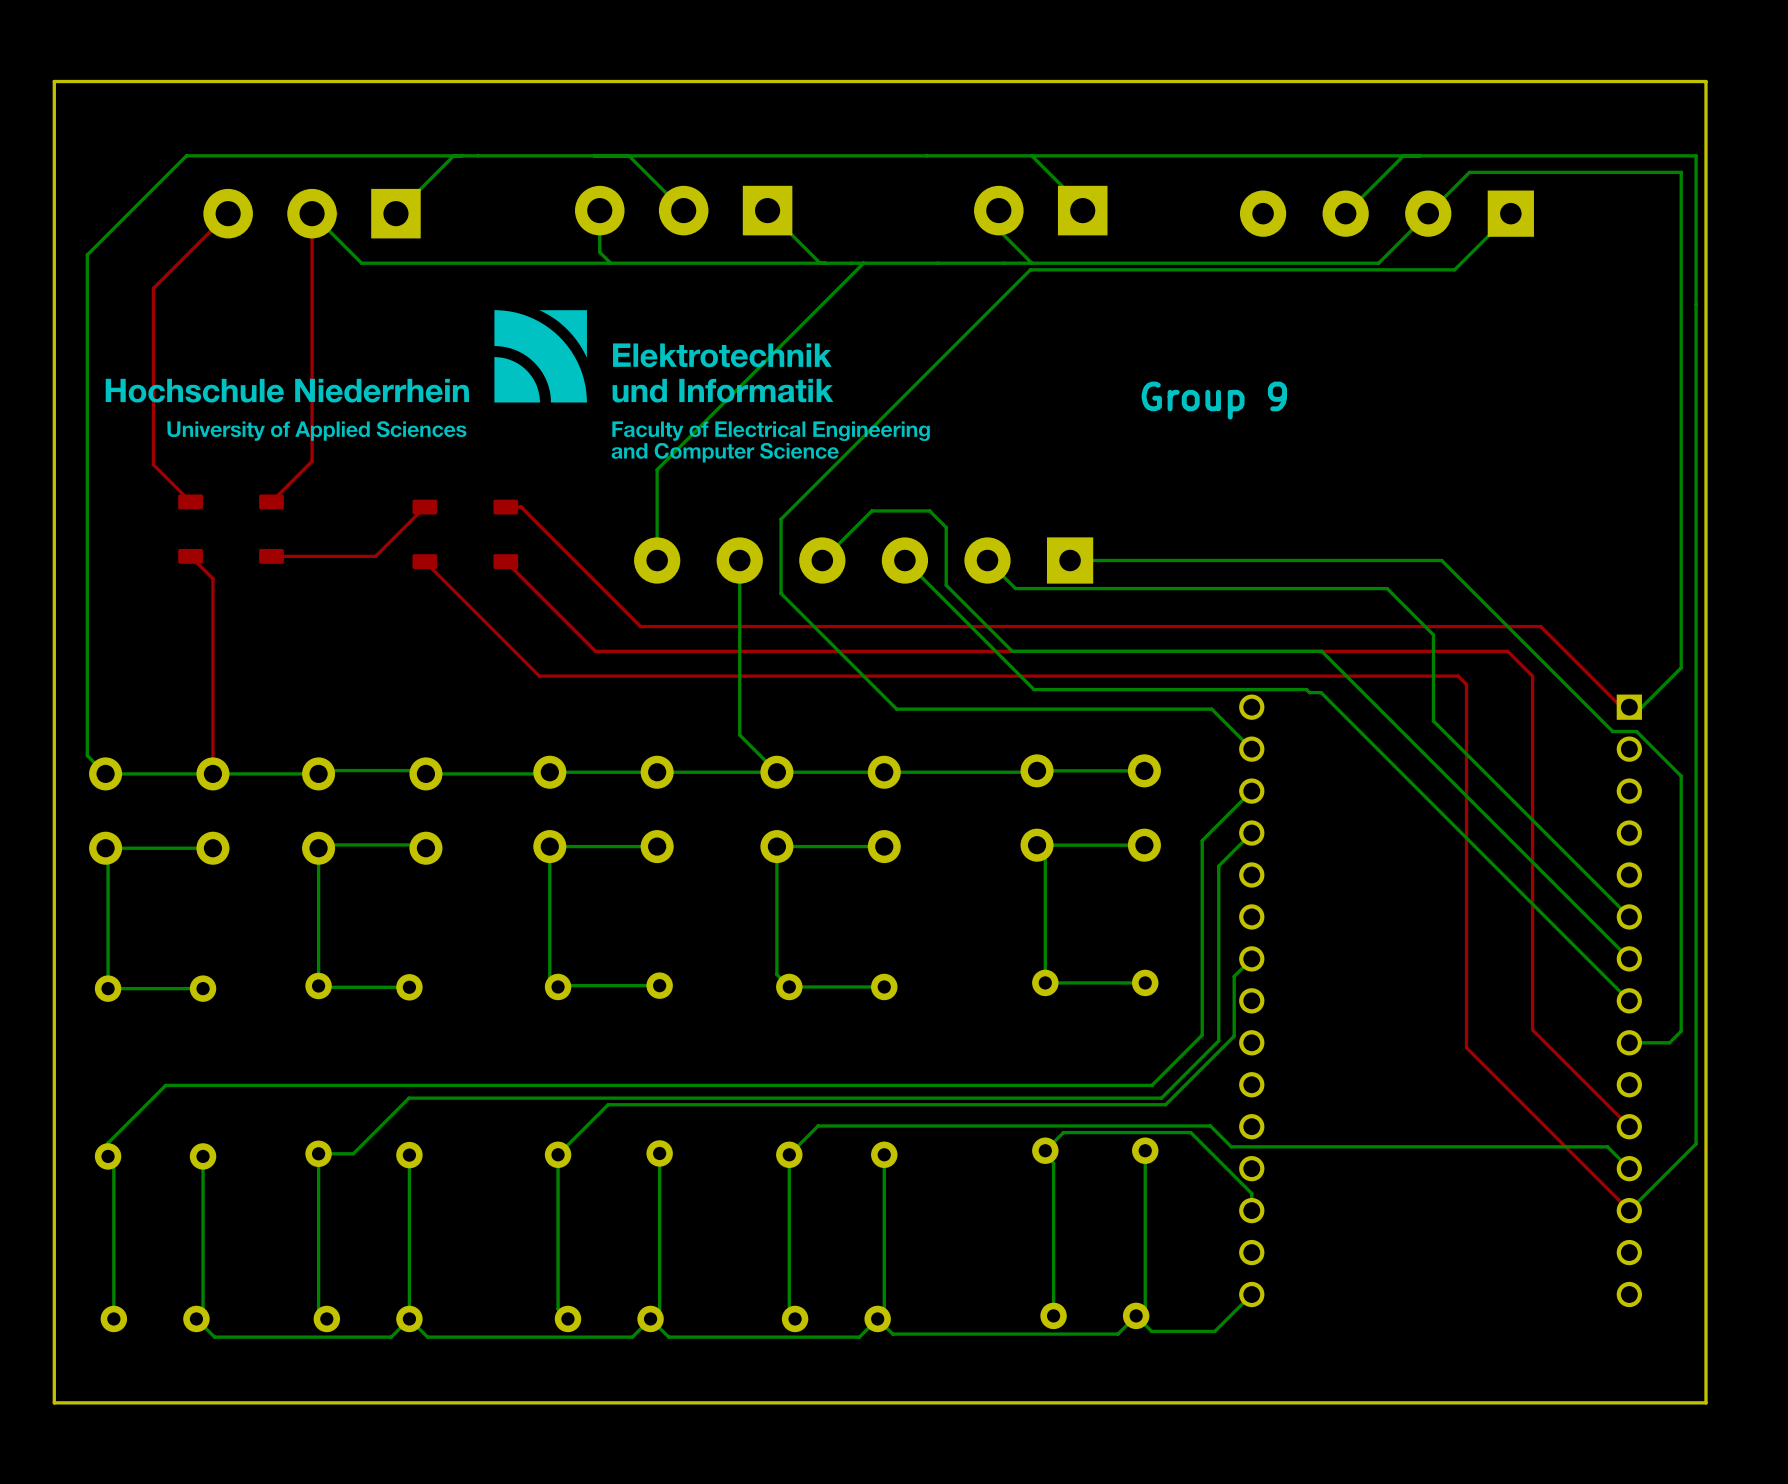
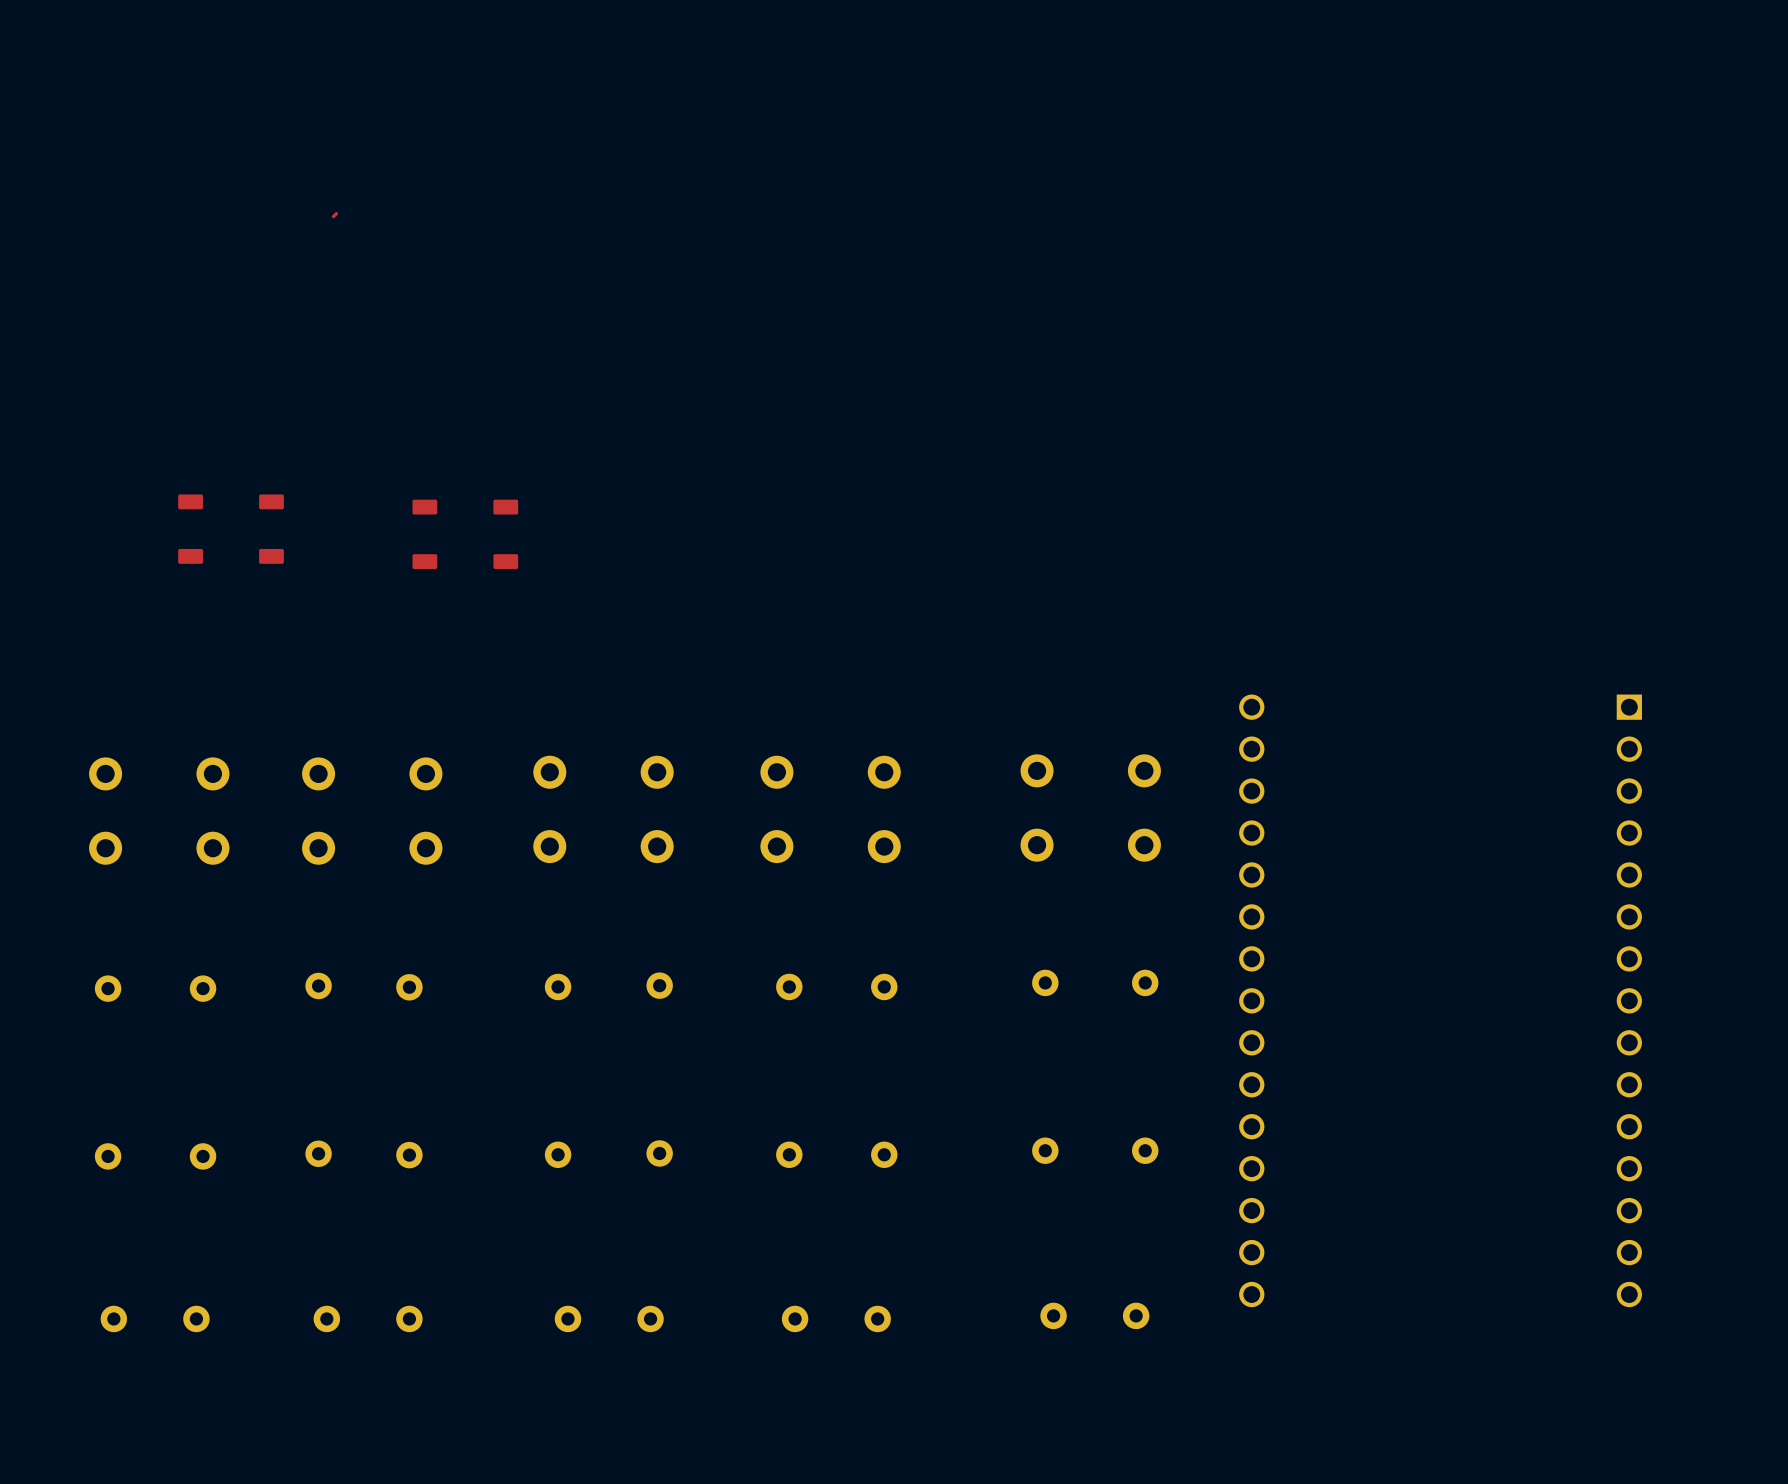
board edge: (1705, 81) (54, 81) (54, 1402) (1705, 1402) (1705, 81) -> none
bottom track: (453, 155) (395, 213) -> none
bottom track: (628, 155) (683, 210) -> none
bottom track: (1031, 155) (1082, 206) (1082, 210) -> none
bottom track: (1403, 155) (1345, 213) -> none
bottom track: (599, 210) (599, 252) (610, 263) -> none
part: (683, 210) -> none
bottom track: (767, 210) (820, 263) -> none
bottom track: (998, 210) (998, 230) (1031, 263) -> none
part: (1040, 210) -> none
top track: (228, 213) (153, 288) (153, 464) (190, 501) -> none
bottom track: (312, 213) (361, 263) (1378, 263) (1469, 172) (1681, 172) (1681, 667) (1641, 707) (1629, 707) -> none
top track: (312, 213) (312, 461) (271, 501) -> none
part: (312, 213) -> none
part: (1386, 213) -> none
bottom track: (1510, 213) (1454, 269) (1030, 269) (781, 519) (781, 593) (896, 709) (1211, 709) (1251, 749) -> none
bottom track: (863, 263) (657, 469) (657, 560) -> none
drawing: [105, 310, 930, 463] -> none
text: Group 9 (1214, 400) -> none
top track: (424, 507) (375, 556) (271, 556) -> none
top track: (505, 507) (521, 507) (640, 626) (1540, 626) (1621, 707) (1629, 707) -> none
top track: (190, 556) (212, 578) (212, 773) -> none
bottom track: (739, 560) (739, 735) (776, 772) -> none
bottom track: (822, 560) (871, 510) (929, 510) (946, 527) (946, 585) (1012, 651) (1321, 651) (1629, 958) -> none
part: (863, 560) -> none
bottom track: (904, 560) (1033, 689) (1306, 689) (1309, 692) (1321, 692) (1629, 1000) -> none
bottom track: (987, 560) (1015, 588) (1387, 588) (1433, 634) (1433, 721) (1629, 916) -> none
bottom track: (1070, 560) (1441, 560) (1612, 731) (1636, 731) (1681, 776) (1681, 1031) (1669, 1042) (1629, 1042) -> none
top track: (424, 561) (539, 676) (1458, 676) (1466, 684) (1466, 1047) (1629, 1210) -> none
top track: (505, 561) (595, 651) (1507, 651) (1532, 676) (1532, 1029) (1629, 1126) -> none
bottom track: (425, 770) (318, 770) (315, 773) -> none
bottom track: (1037, 770) (425, 773) -> none
bottom track: (1144, 770) (1037, 770) -> none
bottom track: (318, 773) (105, 773) (87, 755) (87, 254) (186, 155) (1696, 155) (1696, 1143) (1629, 1210) -> none
bottom track: (1251, 791) (1202, 840) (1202, 1035) (1151, 1085) (165, 1085) (108, 1143) (108, 1156) (113, 1162) (113, 1318) -> none
bottom track: (1251, 833) (1218, 866) (1218, 1040) (1161, 1098) (409, 1098) (353, 1153) (318, 1153) (318, 1310) (326, 1318) -> none
bottom track: (425, 844) (318, 844) -> none
bottom track: (1045, 845) (1045, 982) (1145, 982) -> none
bottom track: (1144, 845) (1037, 845) -> none
bottom track: (657, 846) (549, 846) (549, 978) (558, 986) (659, 985) (657, 983) -> none
bottom track: (884, 846) (776, 846) (776, 974) (789, 986) (884, 986) -> none
bottom track: (212, 848) (105, 848) (108, 850) (108, 988) (203, 988) -> none
bottom track: (318, 848) (318, 985) (409, 987) -> none
bottom track: (1251, 958) (1234, 976) (1234, 1036) (1165, 1104) (608, 1104) (558, 1154) (558, 1309) (567, 1318) -> none
bottom track: (1145, 1150) (1145, 1306) (1117, 1334) (892, 1334) (877, 1318) -> none
bottom track: (659, 1153) (659, 1309) (632, 1337) (427, 1337) (409, 1318) -> none
bottom track: (884, 1154) (884, 1312) (859, 1337) (668, 1337) (650, 1318) -> none
bottom track: (409, 1155) (409, 1318) -> none
bottom track: (203, 1156) (203, 1312) (196, 1318) (214, 1337) (391, 1337) (409, 1318) -> none
bottom track: (1629, 1168) (1607, 1146) (1231, 1146) (1210, 1125) (818, 1125) (789, 1154) (789, 1313) (795, 1318) (799, 1314) -> none
bottom track: (1251, 1210) (1251, 1193) (1190, 1132) (1063, 1132) (1045, 1150) (1045, 1154) (1053, 1163) (1053, 1315) (1045, 1307) -> none
bottom track: (1251, 1294) (1214, 1331) (1151, 1331) (1136, 1315) -> none

